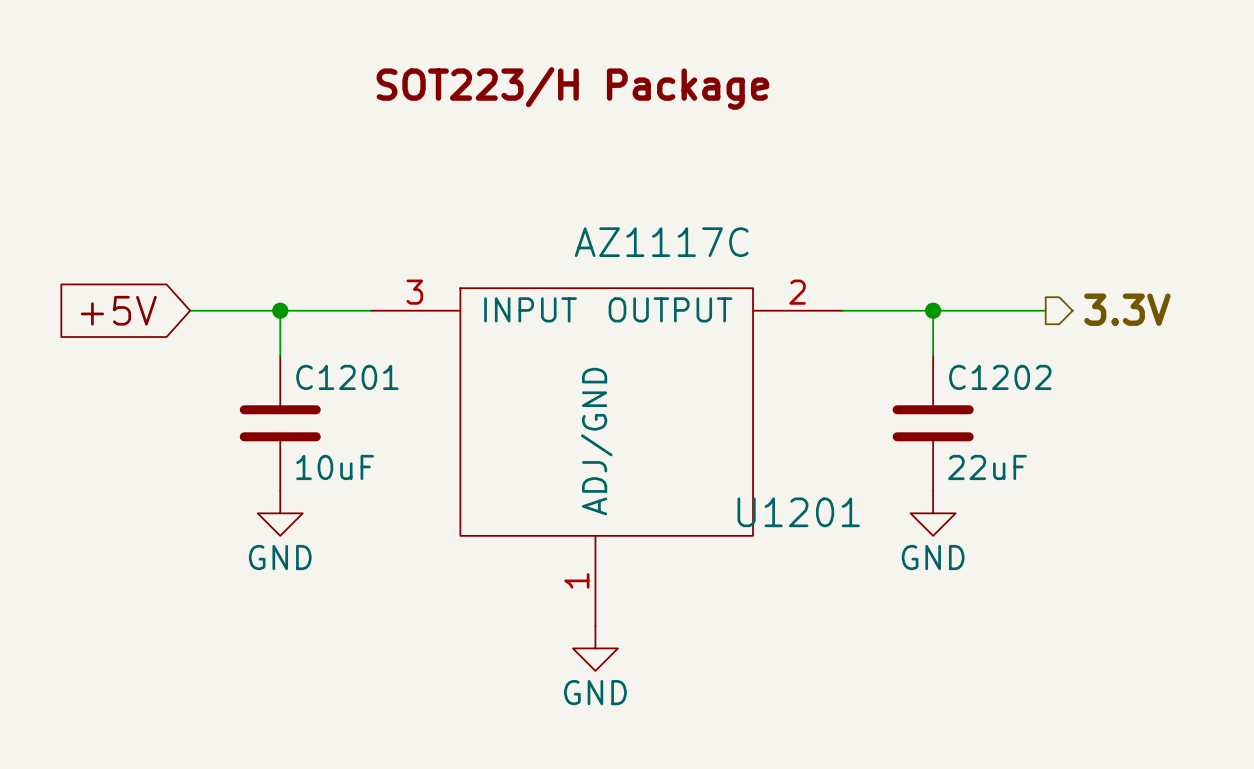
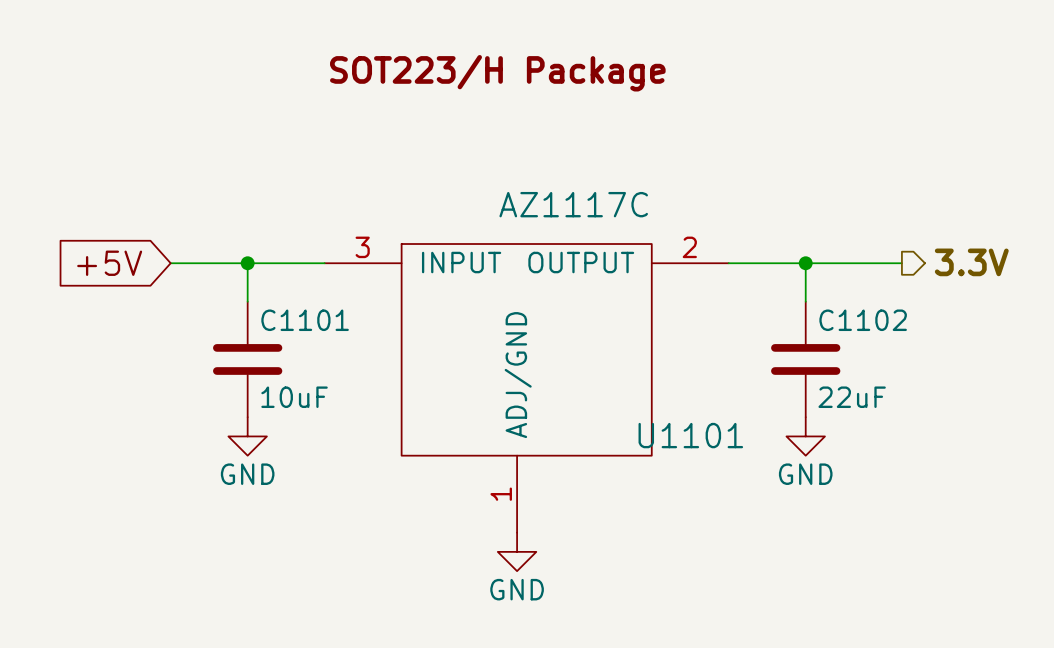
C1201 name: C1201 (347, 377) -> C1101 (305, 320)
C1202 name: C1202 (1000, 377) -> C1102 (863, 320)
U1201 name: U1201 (798, 512) -> U1101 (690, 435)

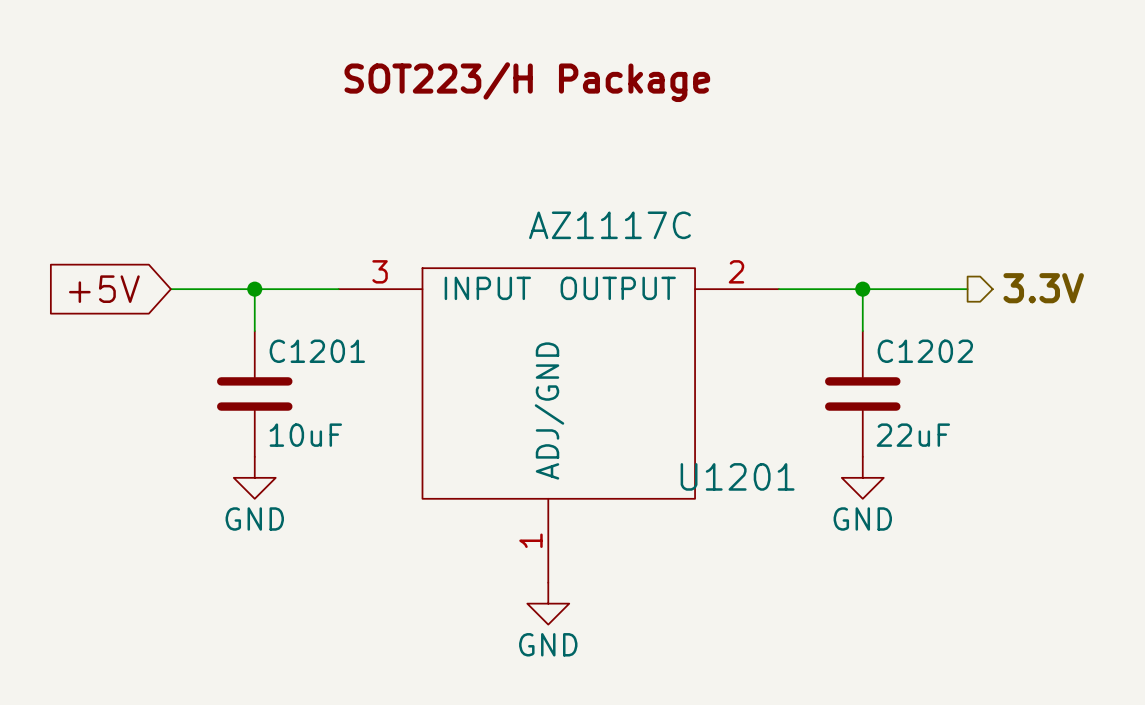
C1101 name: C1101 (305, 320) -> C1201 (317, 351)
C1102 name: C1102 (863, 320) -> C1202 (925, 351)
U1101 name: U1101 (690, 435) -> U1201 (737, 476)

